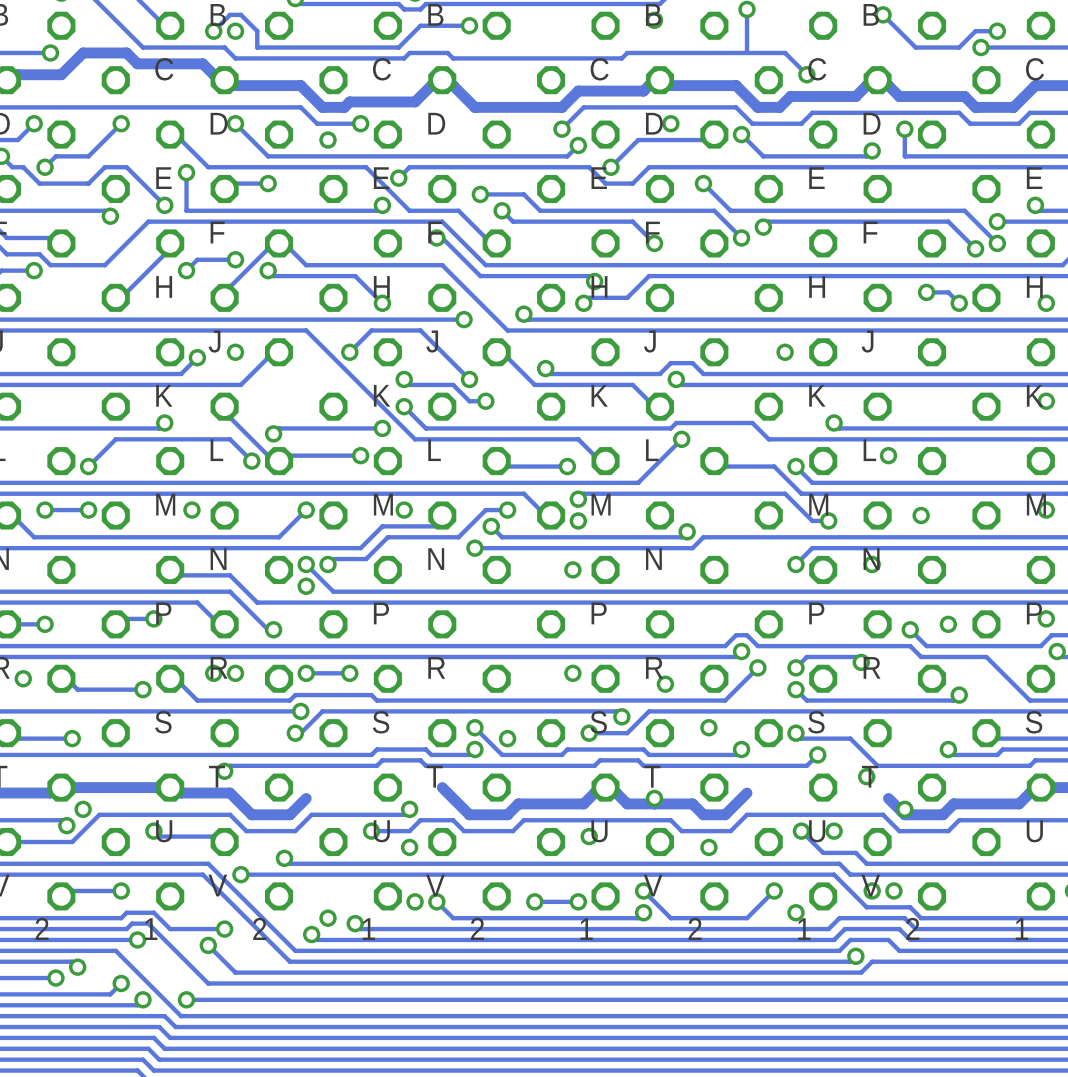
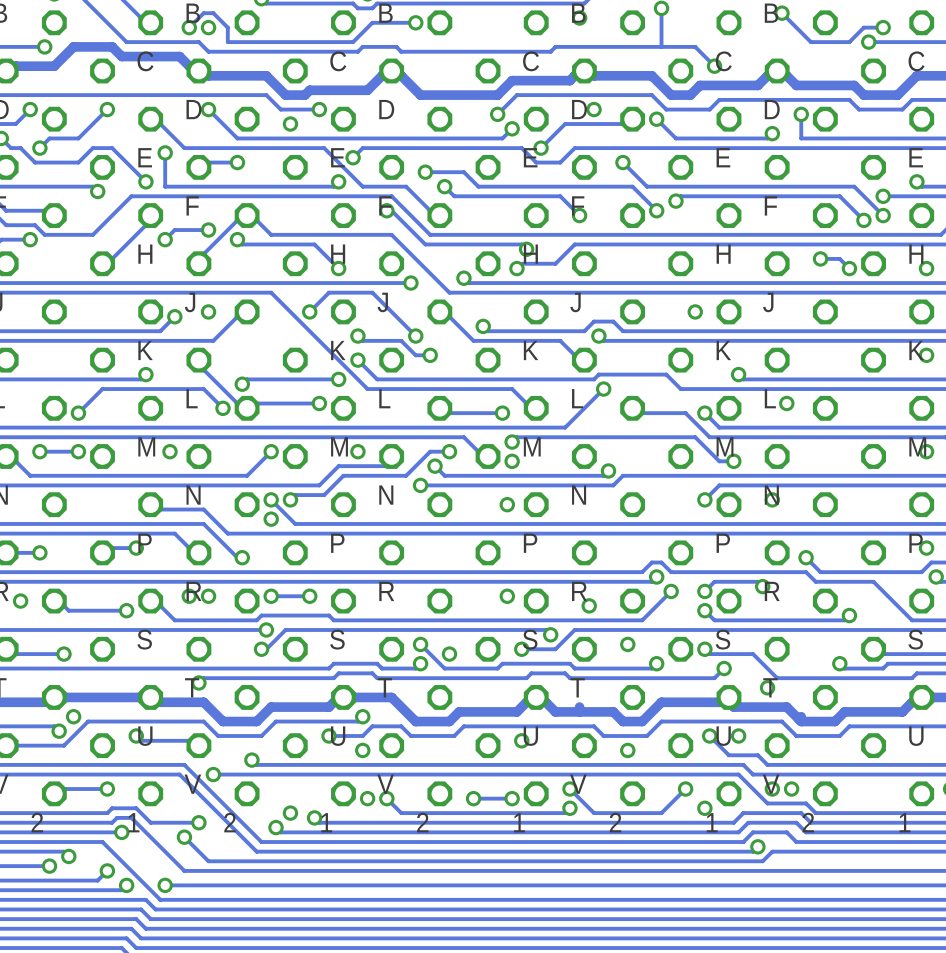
via: (921, 515) -> none
via: (948, 624) -> none
track: none -> (391, 697) (343, 697) (329, 707) (271, 707)
track: none -> (661, 702) (719, 702) (728, 697) (733, 707) (786, 707)
via: (654, 798) -> none
via: (904, 809) -> none

